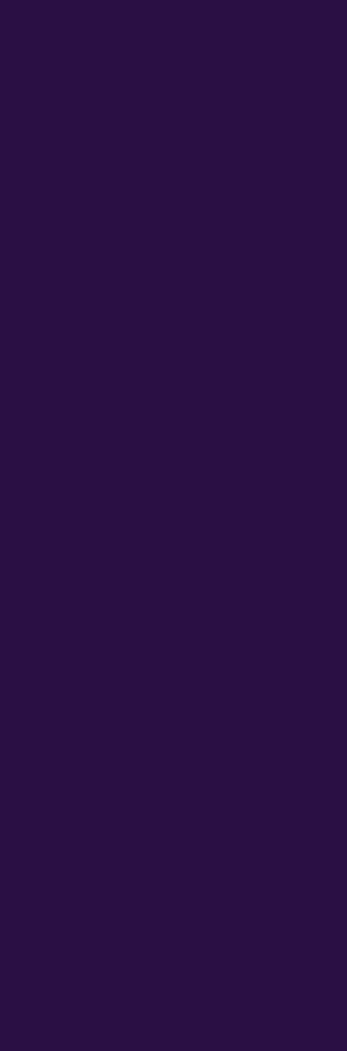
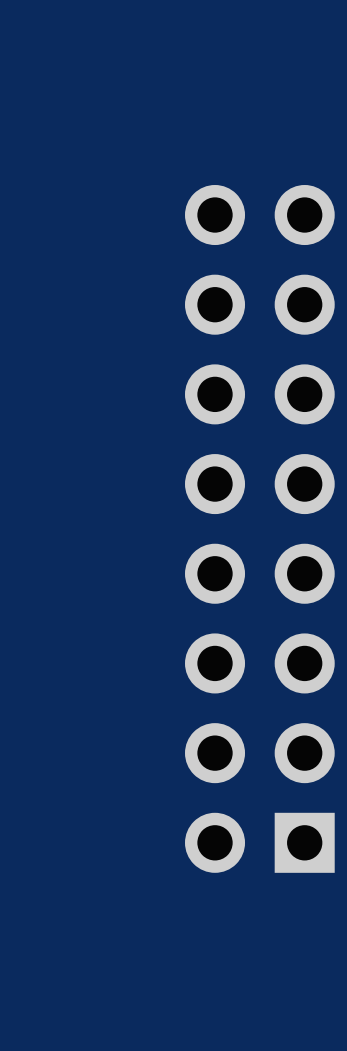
part: none -> (259, 528)

